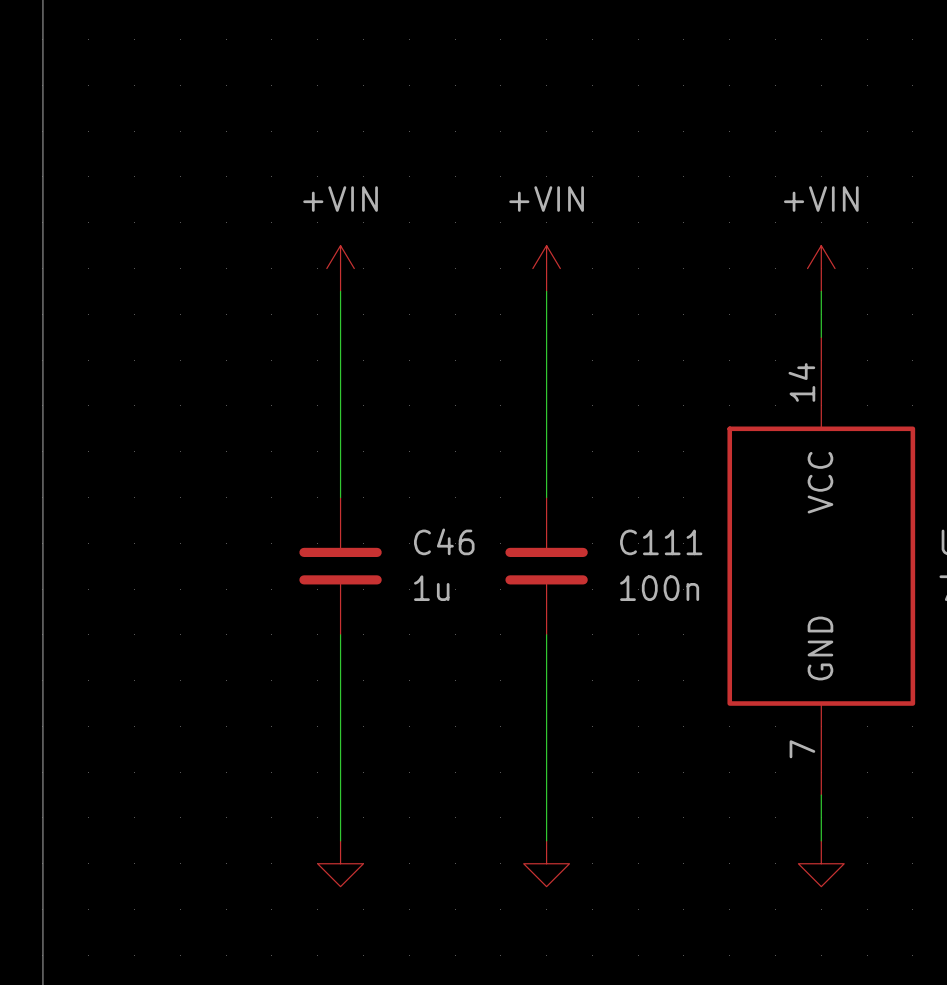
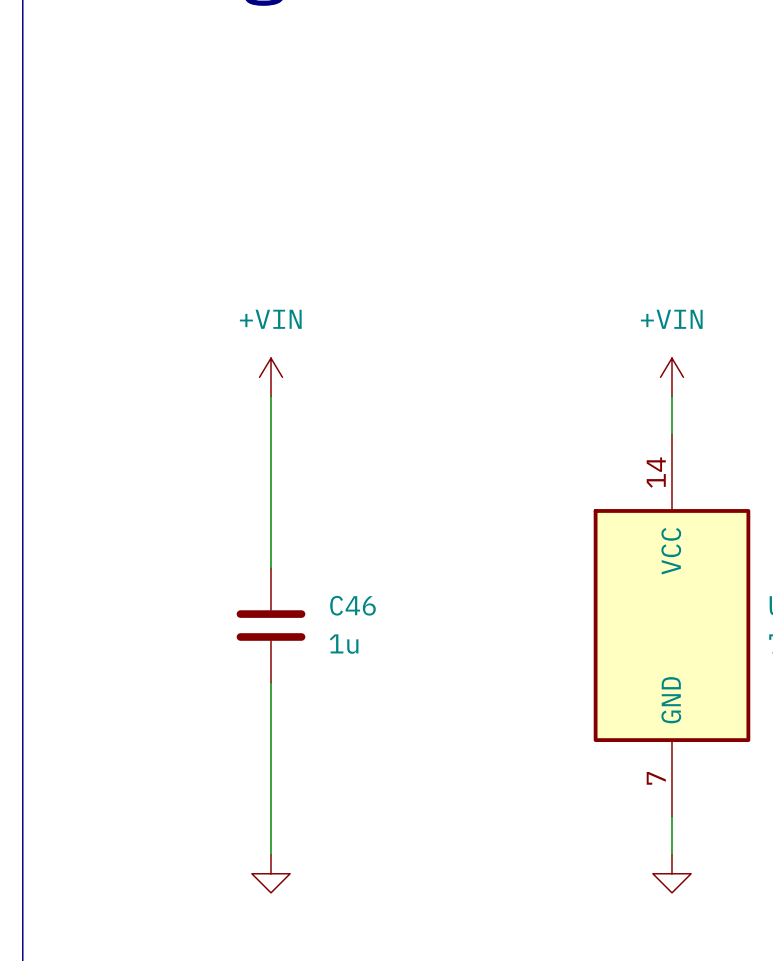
power symbol: +VIN (546, 268) -> none
wire: (546, 291) (546, 497) -> none
C111: 100n (546, 566) -> none
wire: (546, 634) (546, 840) -> none
power symbol: (546, 863) -> none

